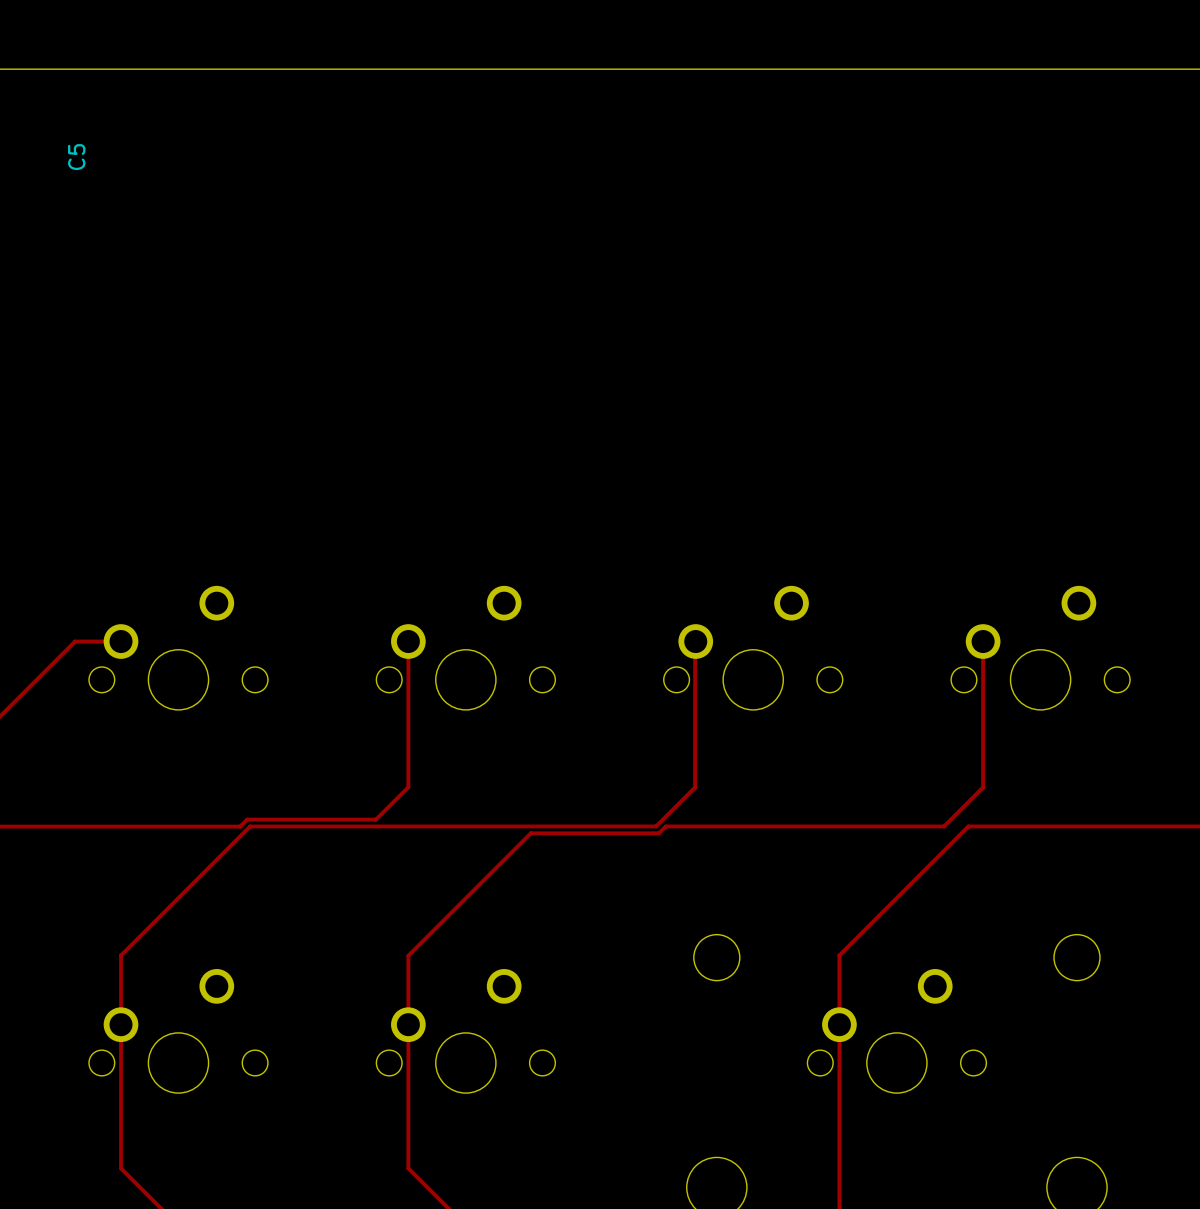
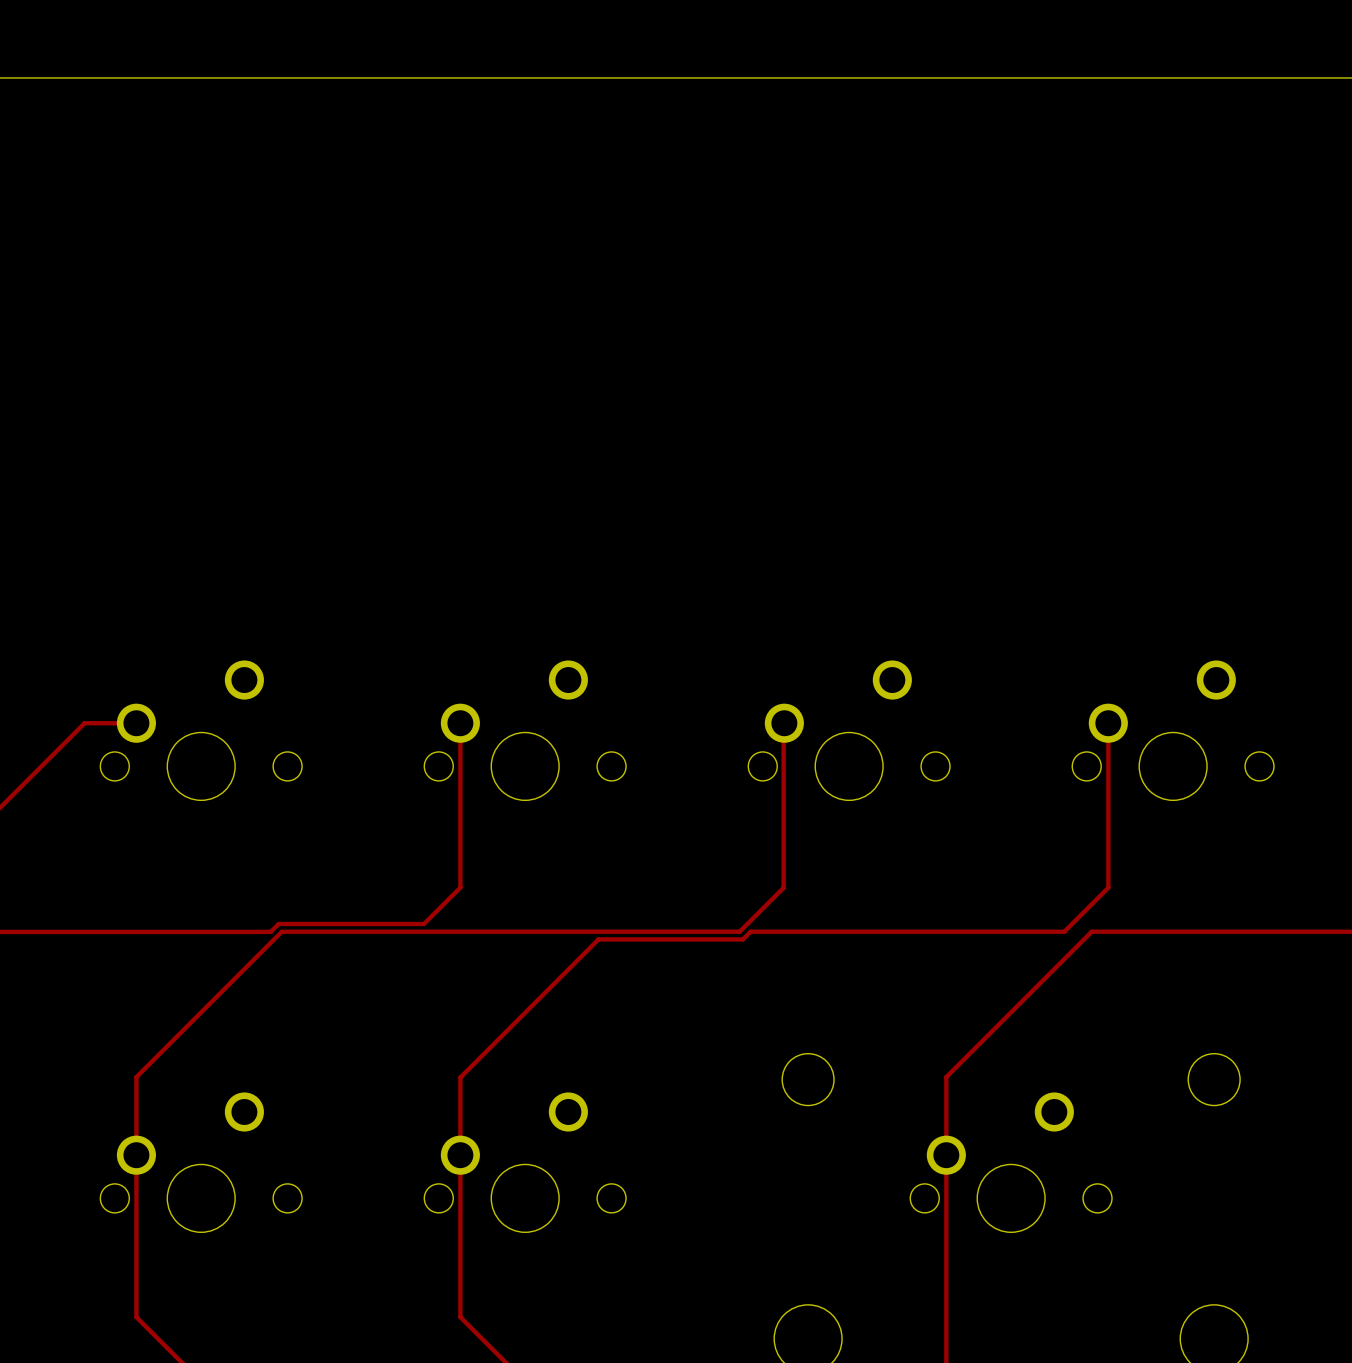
C5: (76, 157) -> none

